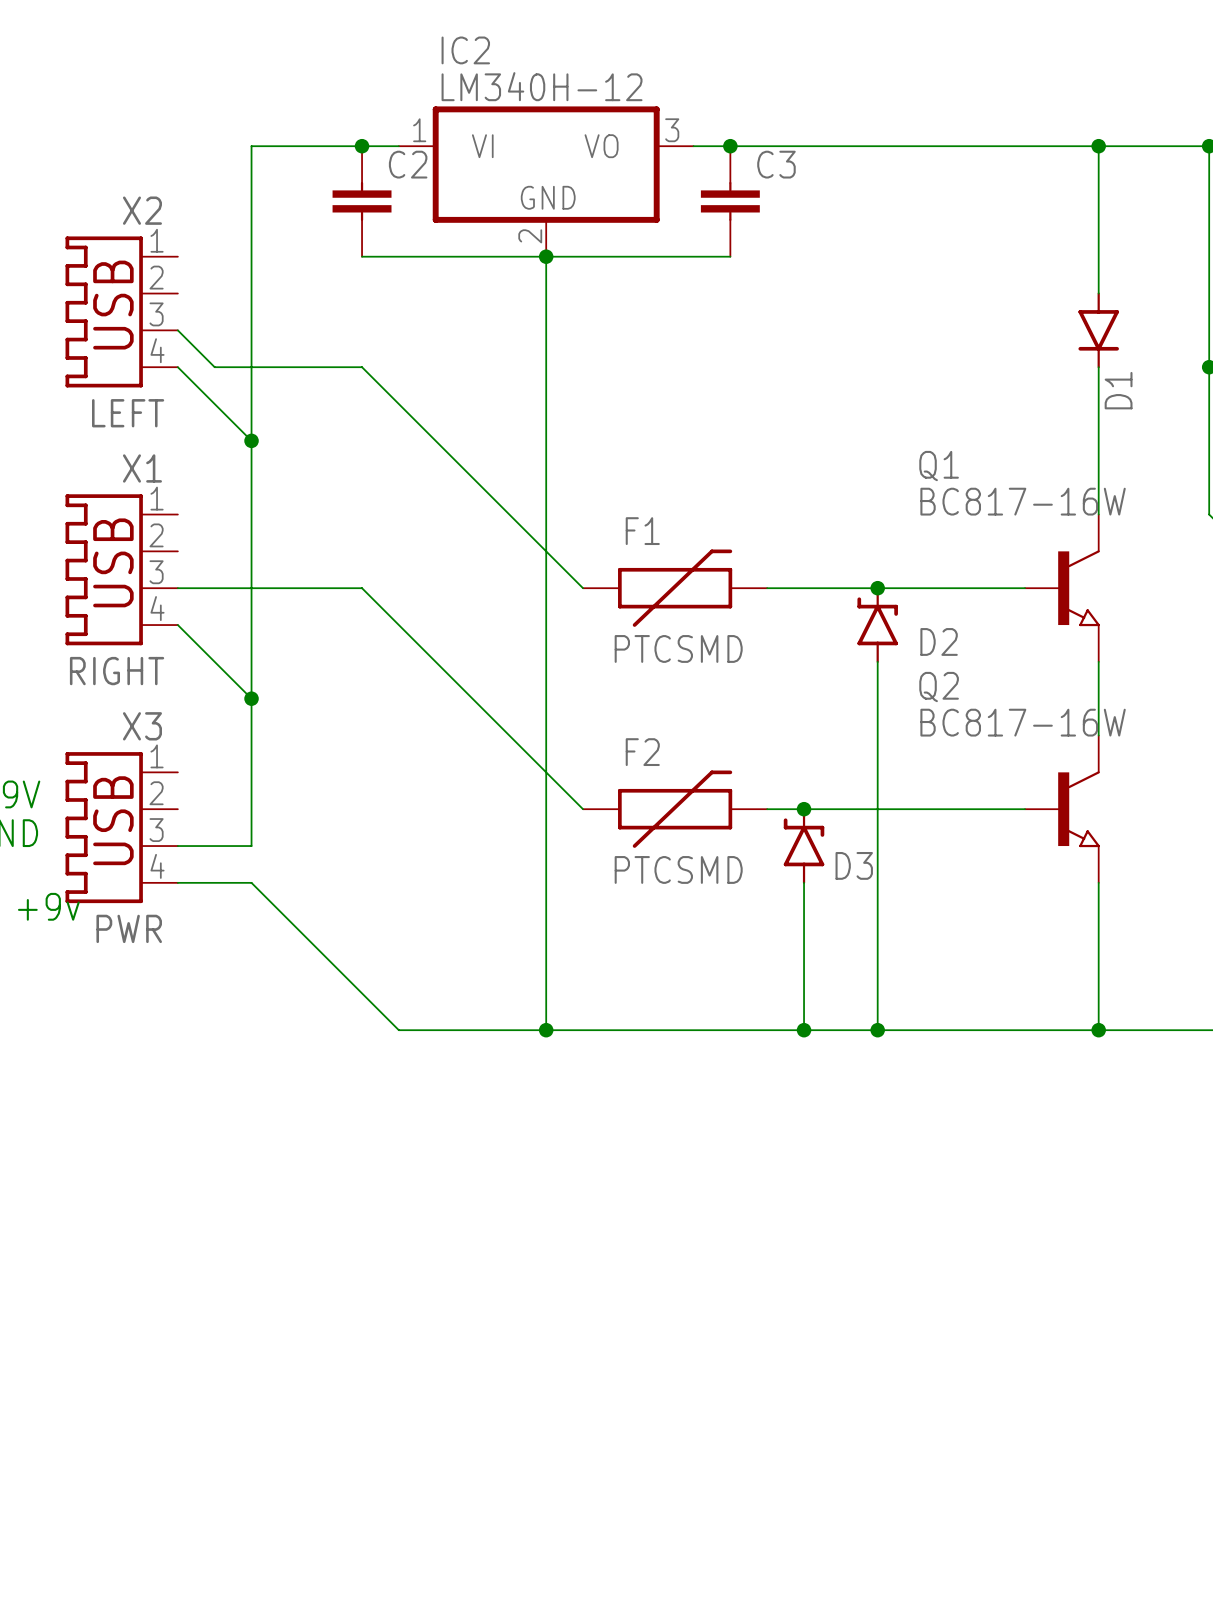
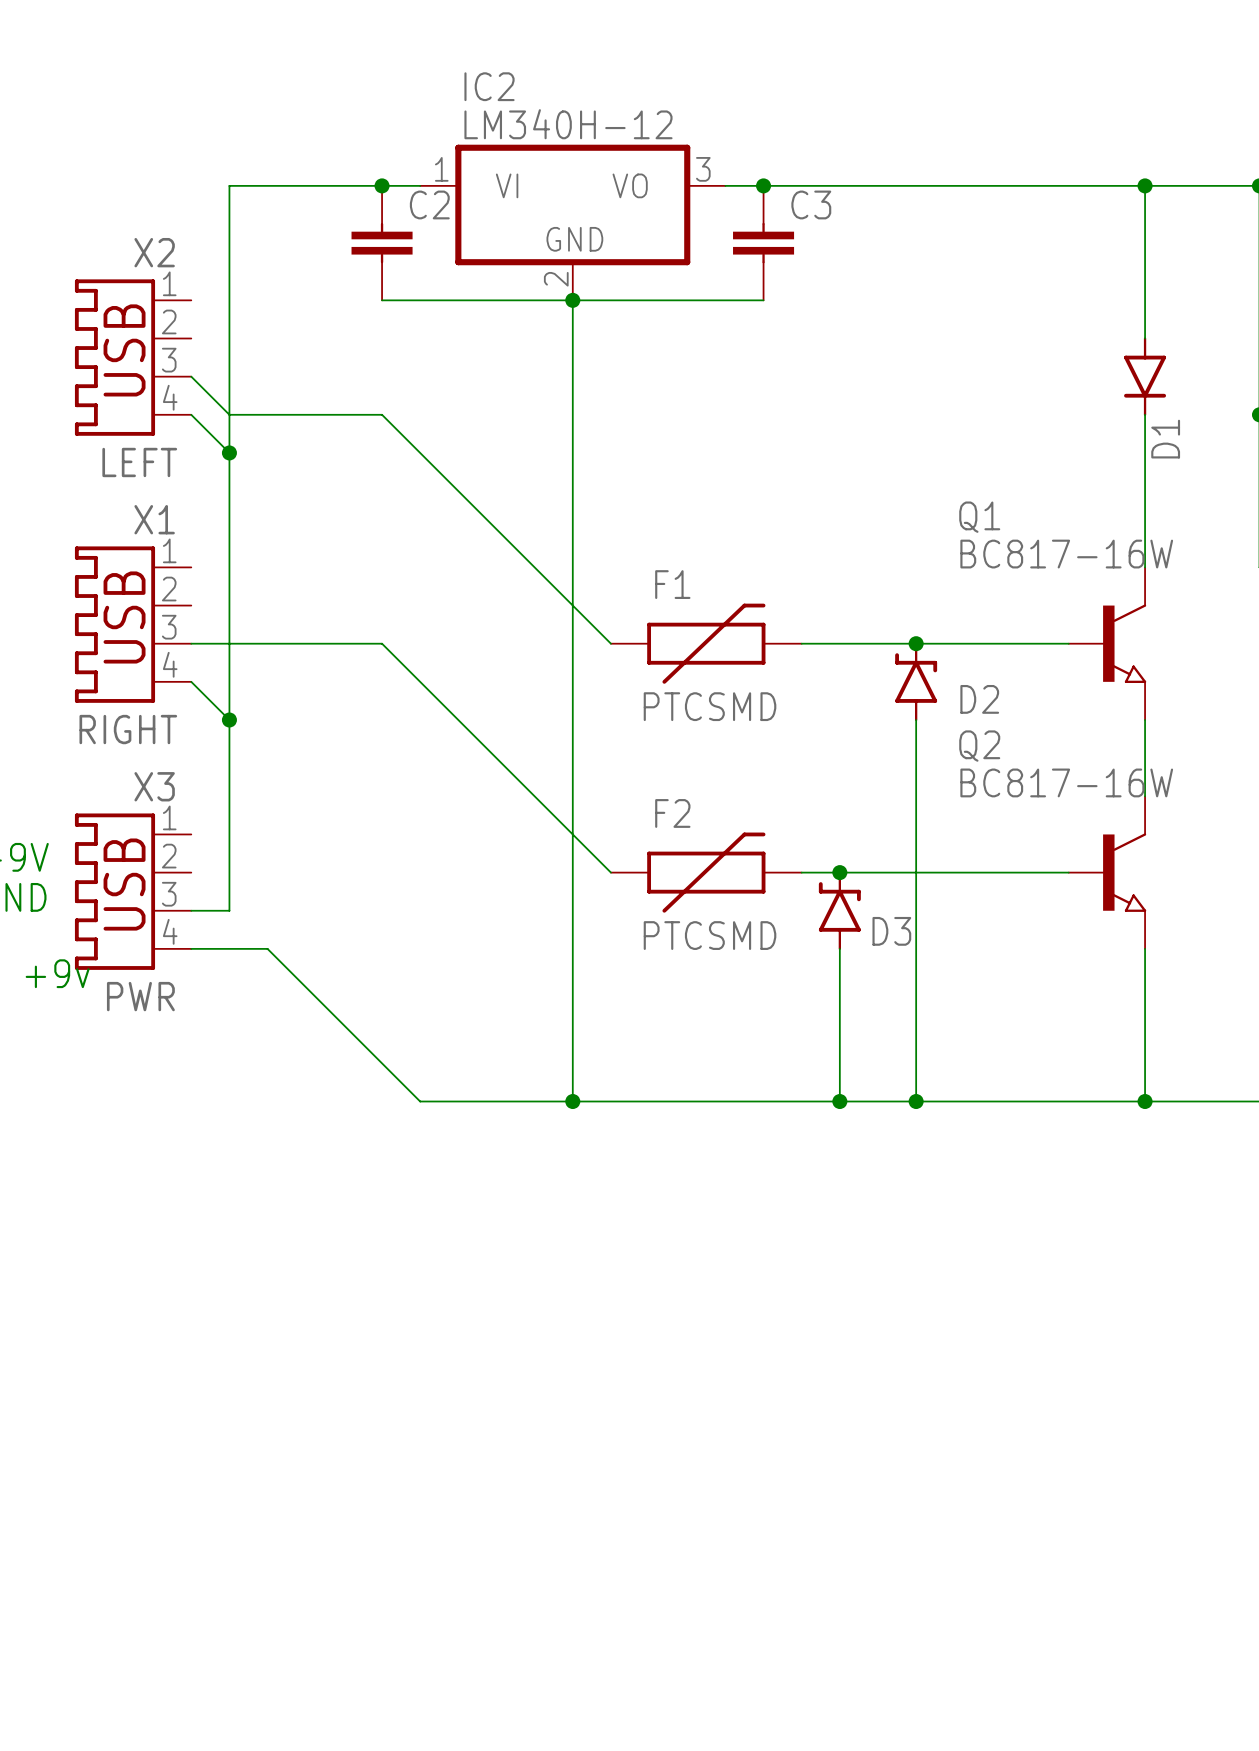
wire: (251, 146) (251, 846) (214, 846) -> (267, 185) (229, 185) (229, 910)
wire: (214, 404) (251, 440) -> none
junction position: (251, 440) -> (229, 452)
wire: (214, 661) (251, 698) -> none
junction position: (251, 698) -> (229, 720)

